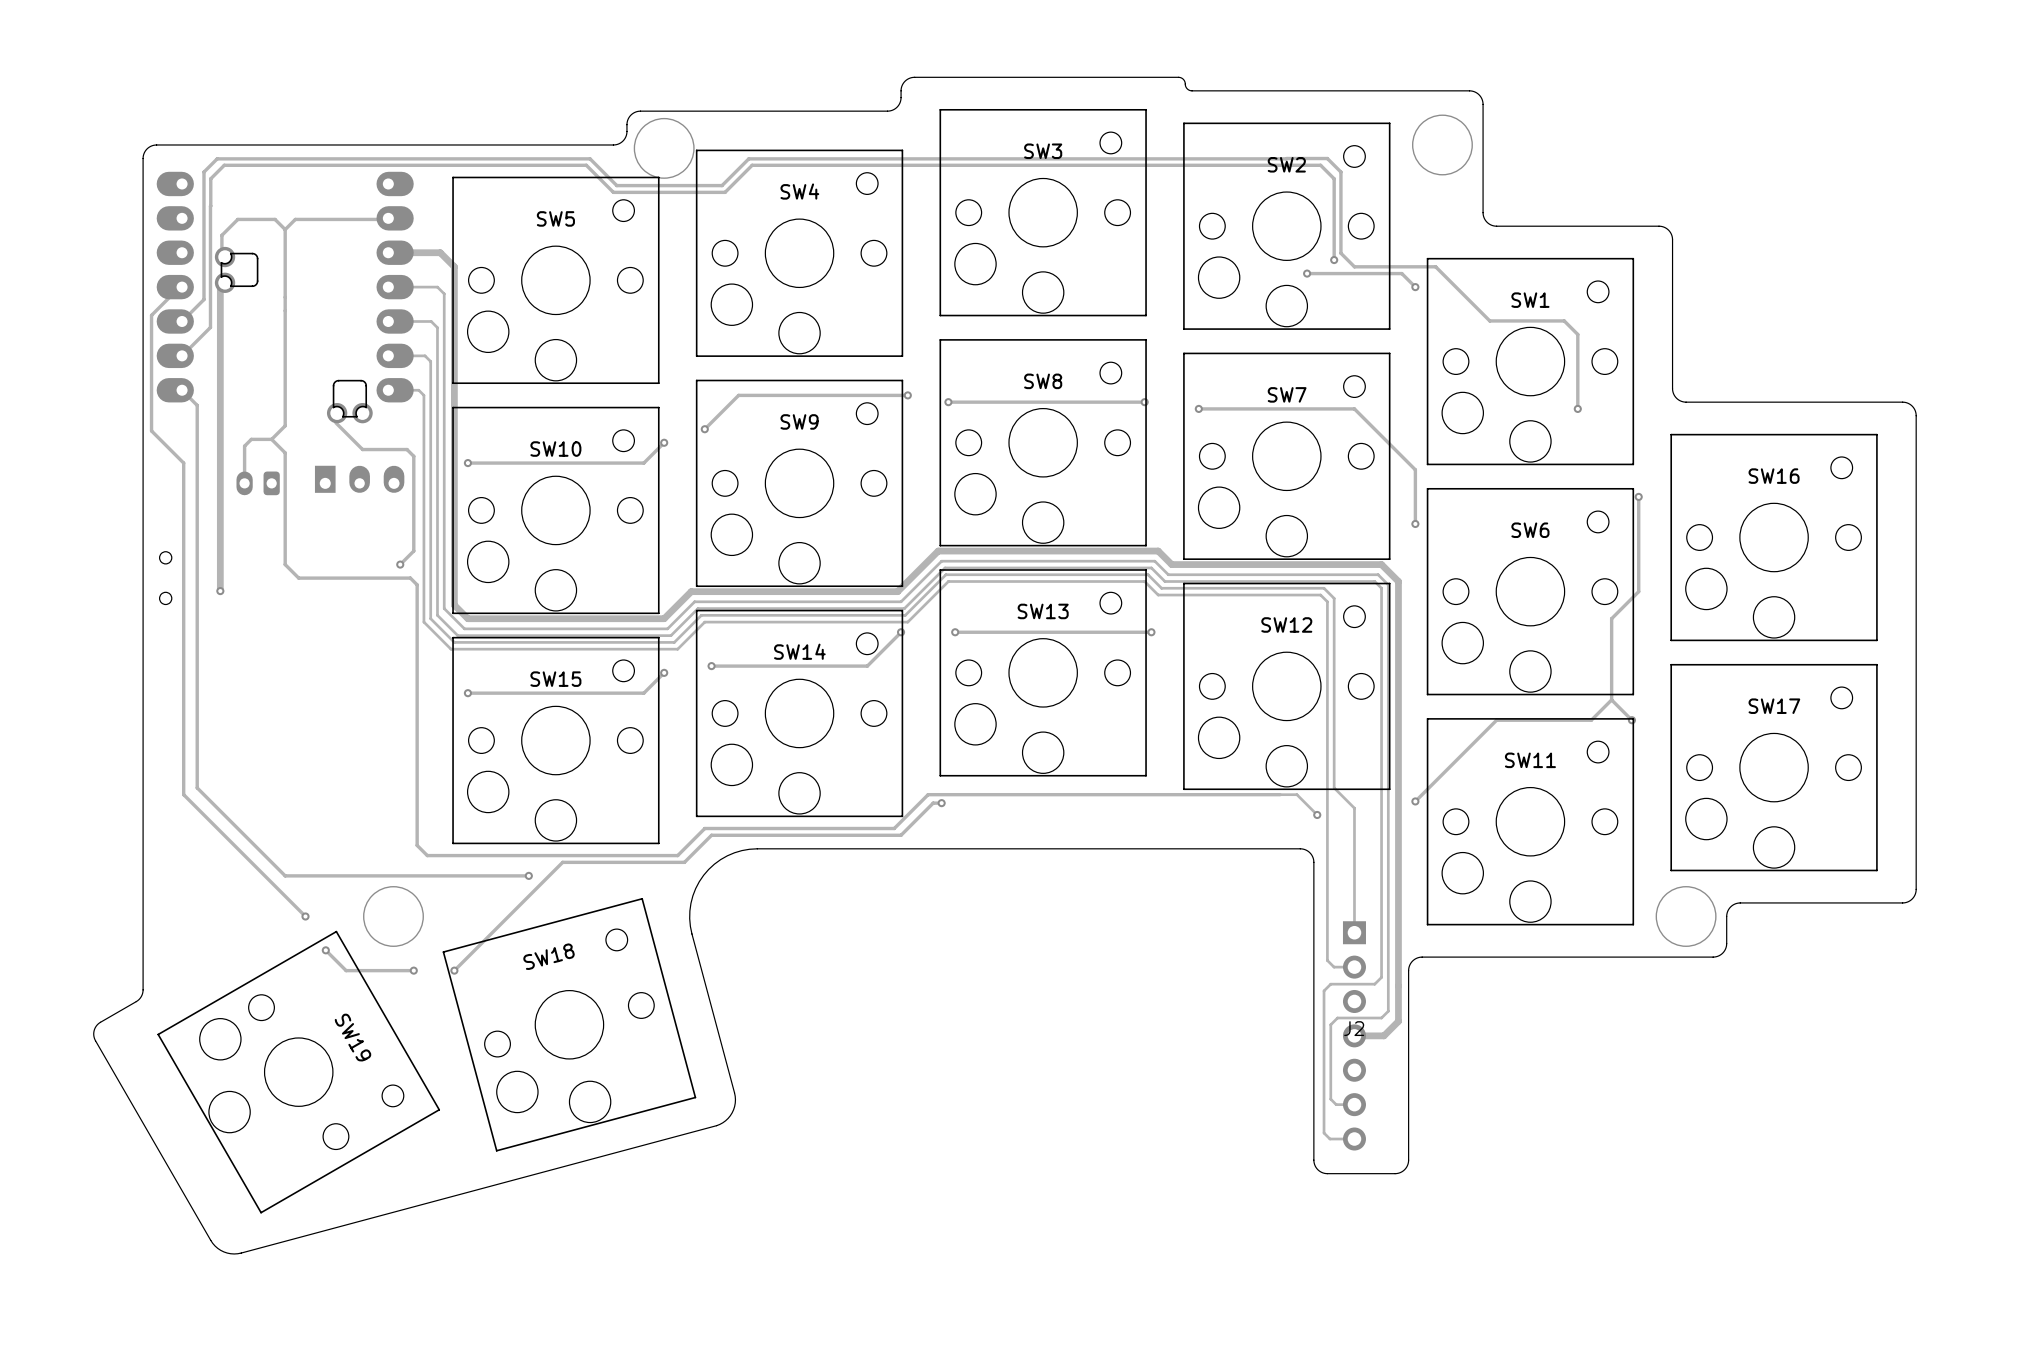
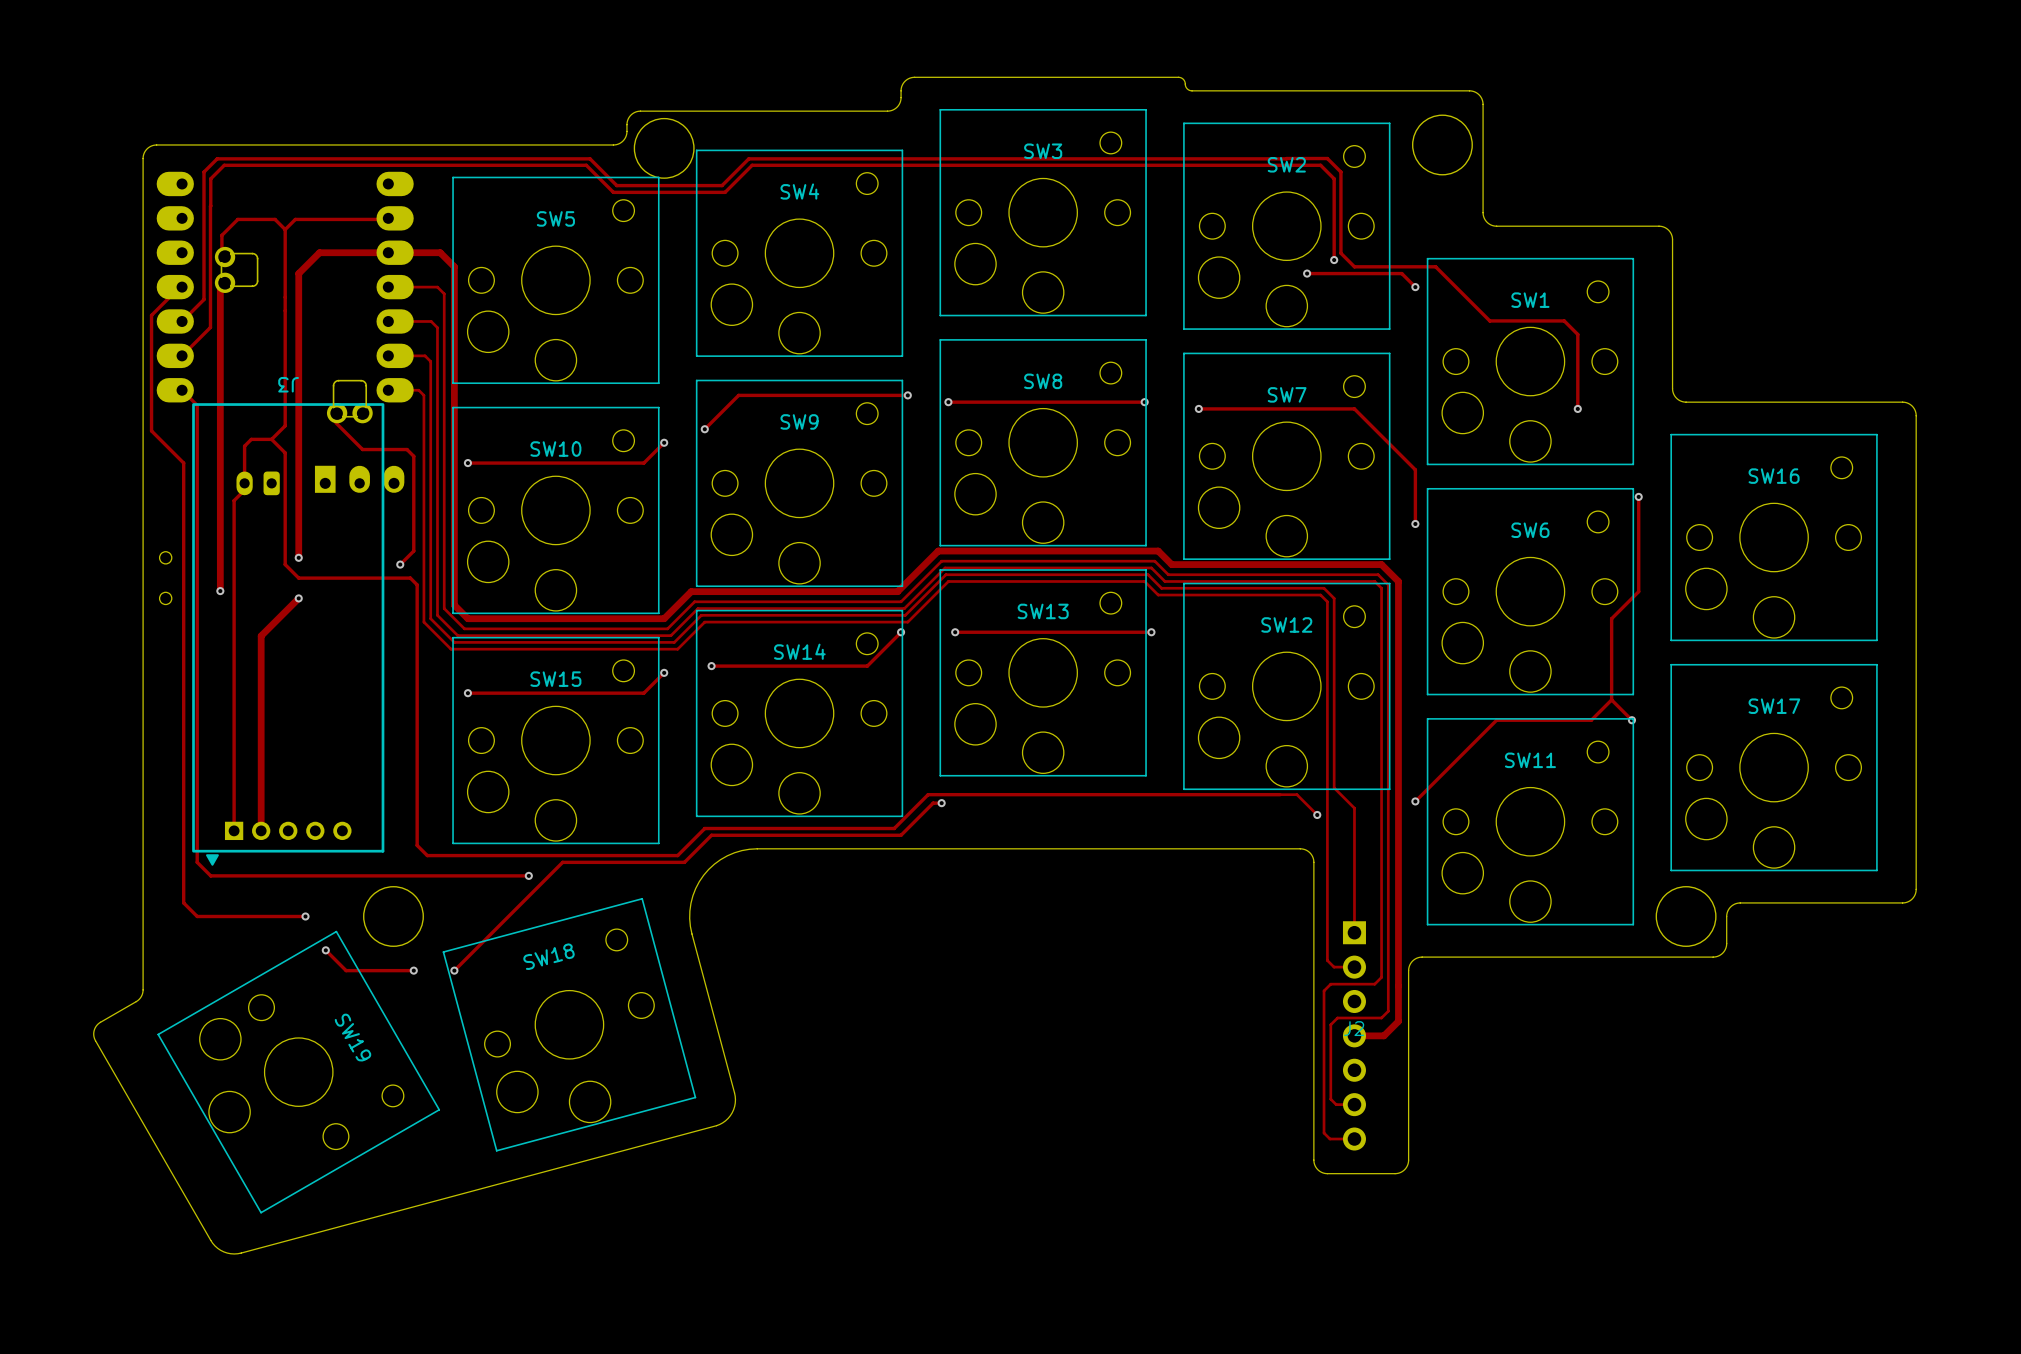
track: none -> (388, 252) (319, 252) (298, 273) (298, 557)
track: none -> (244, 483) (244, 490) (234, 500) (234, 830)
via: none -> (298, 557)
track: none -> (298, 598) (261, 635) (261, 830)
via: none -> (298, 598)
J3: none -> (288, 634)
track: (197, 787) (285, 875) -> (197, 787) (197, 862) (210, 875) (285, 875)
track: (183, 794) (305, 916) -> (183, 794) (183, 902) (197, 916) (305, 916)

